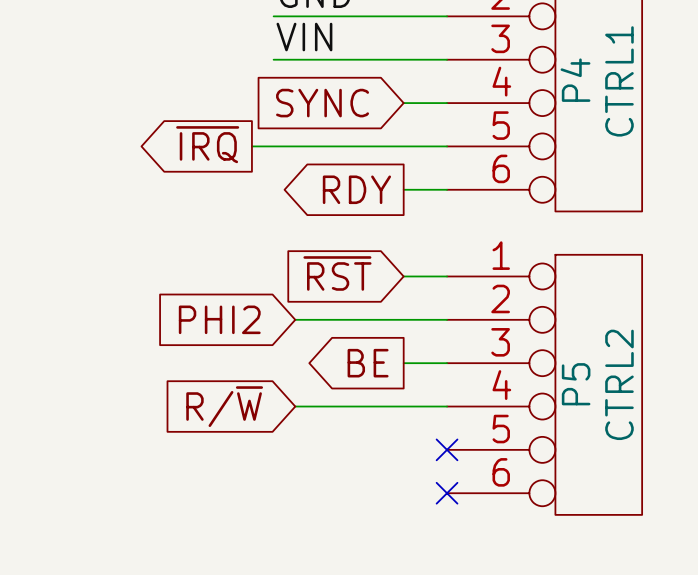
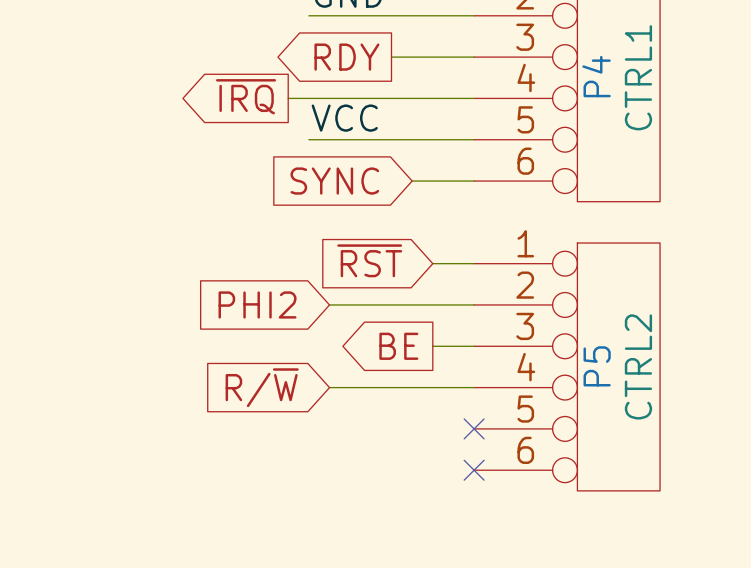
label: VIN (304, 37) -> none
wire: (273, 59) (360, 59) -> none
wire: none -> (288, 98) (432, 98)
global label position: SYNC (322, 103) -> SYNC (334, 181)
label: none -> VCC (344, 118)
global label position: ~{IRQ} (207, 144) -> ~{IRQ} (246, 96)
wire: (251, 146) (273, 146) -> (412, 181) (432, 181)
global label position: RDY (356, 189) -> RDY (346, 57)

